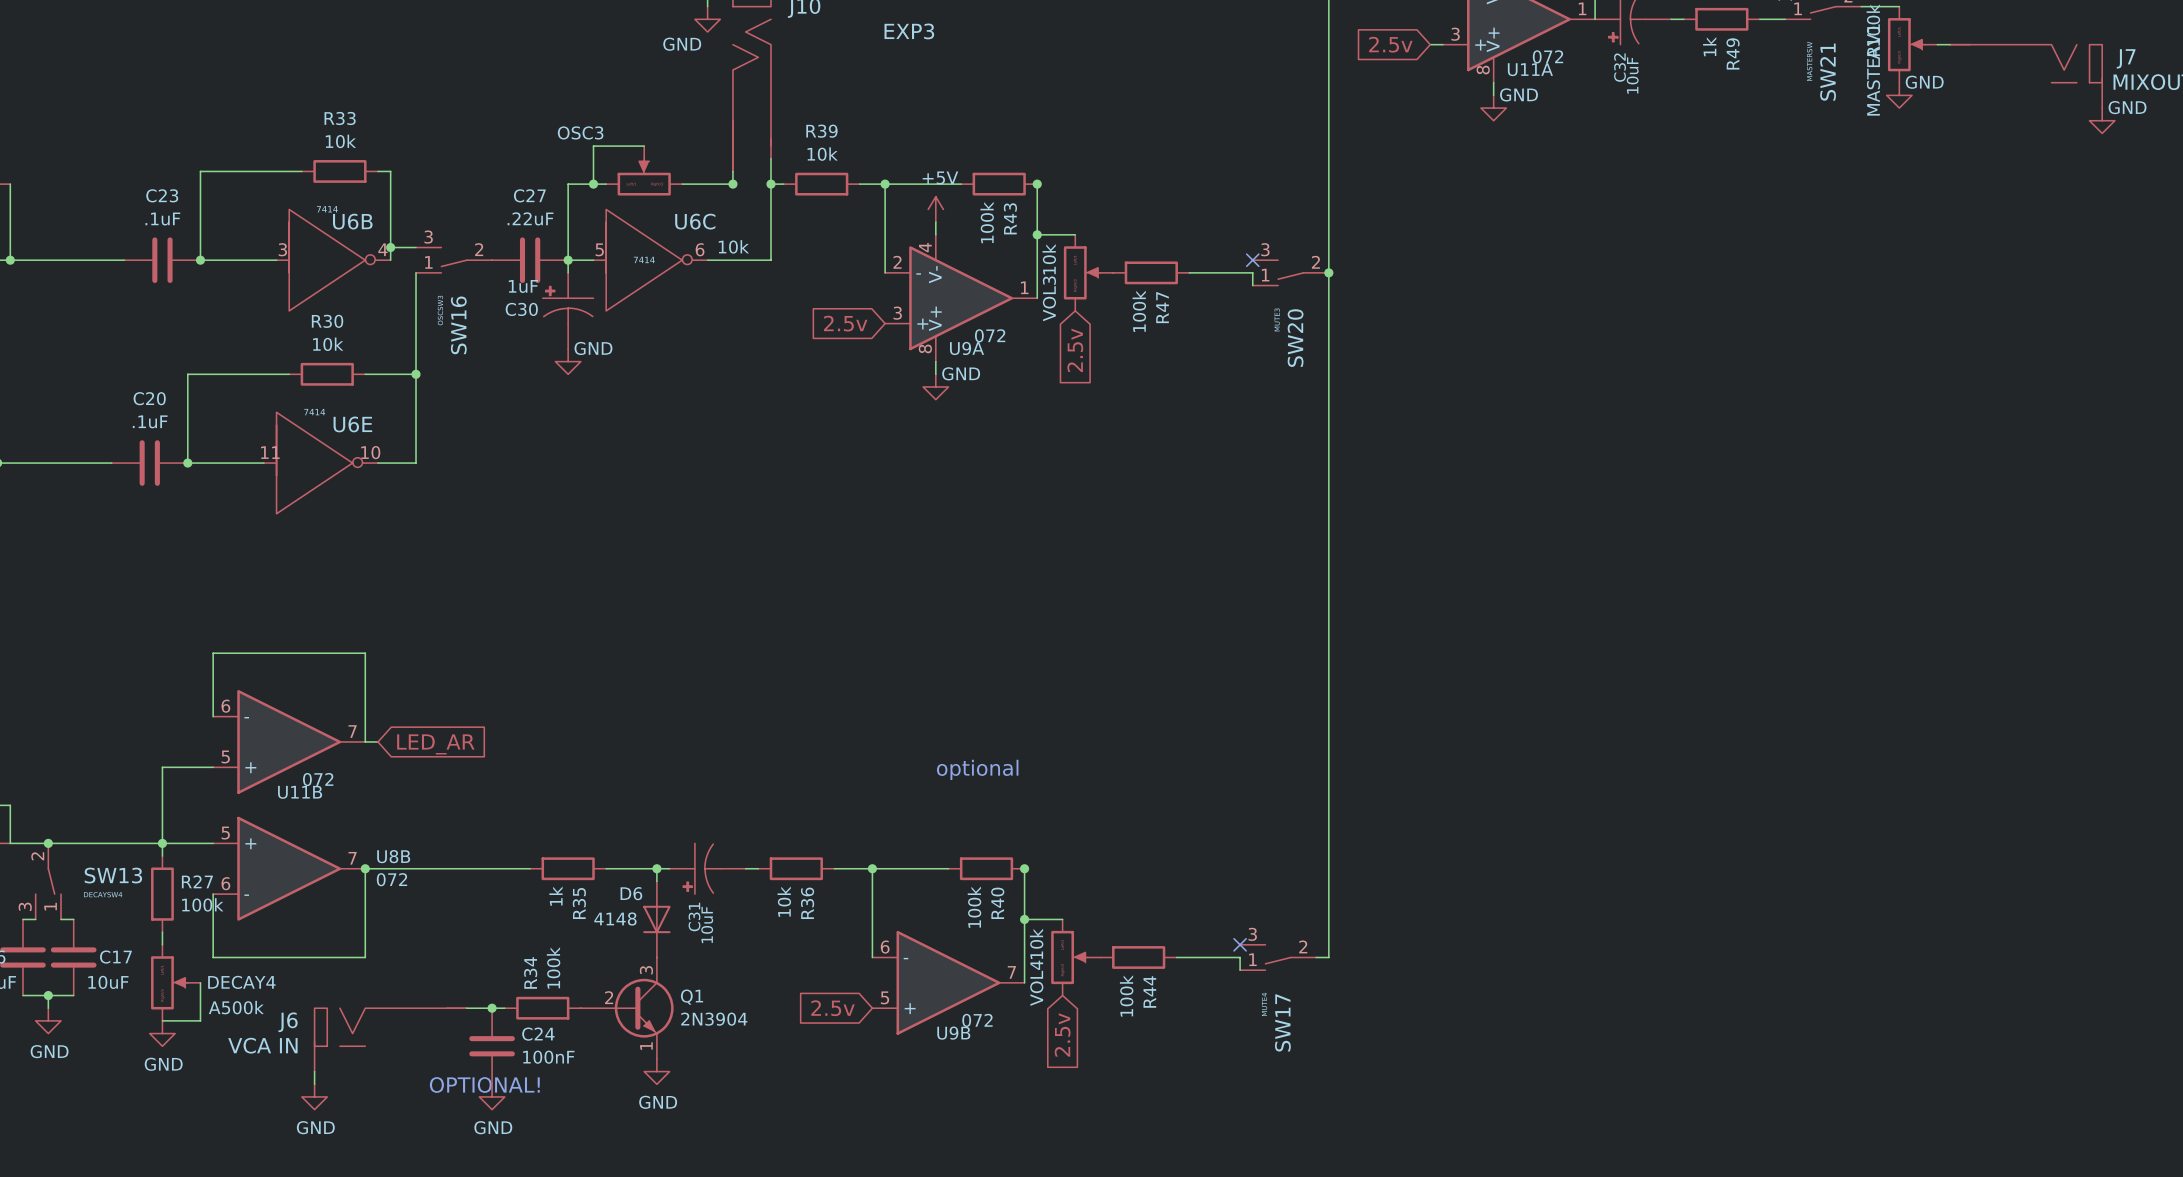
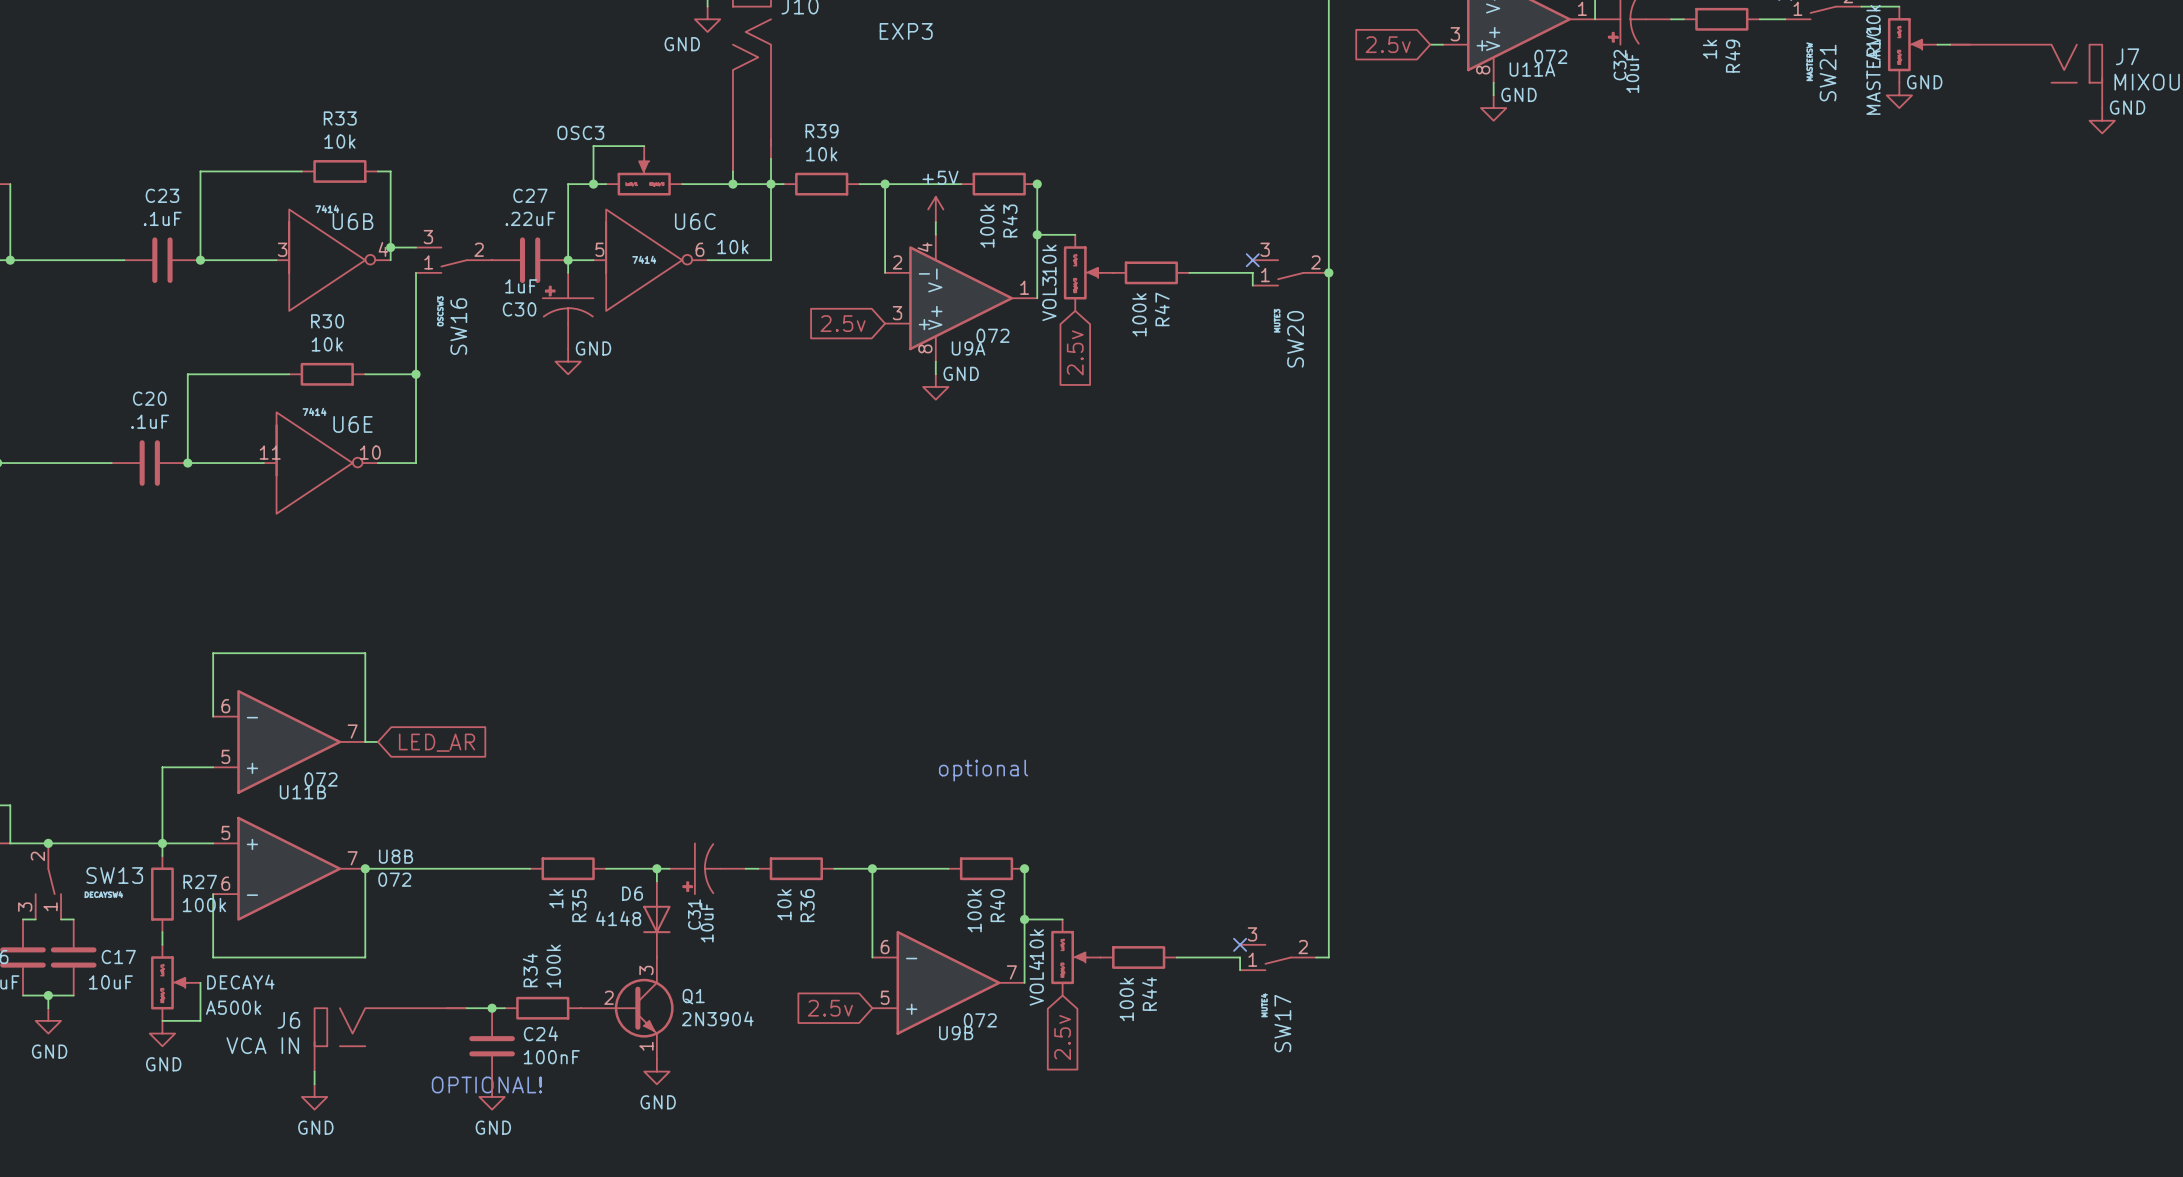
wire: none -> (732, 184) (770, 184)

